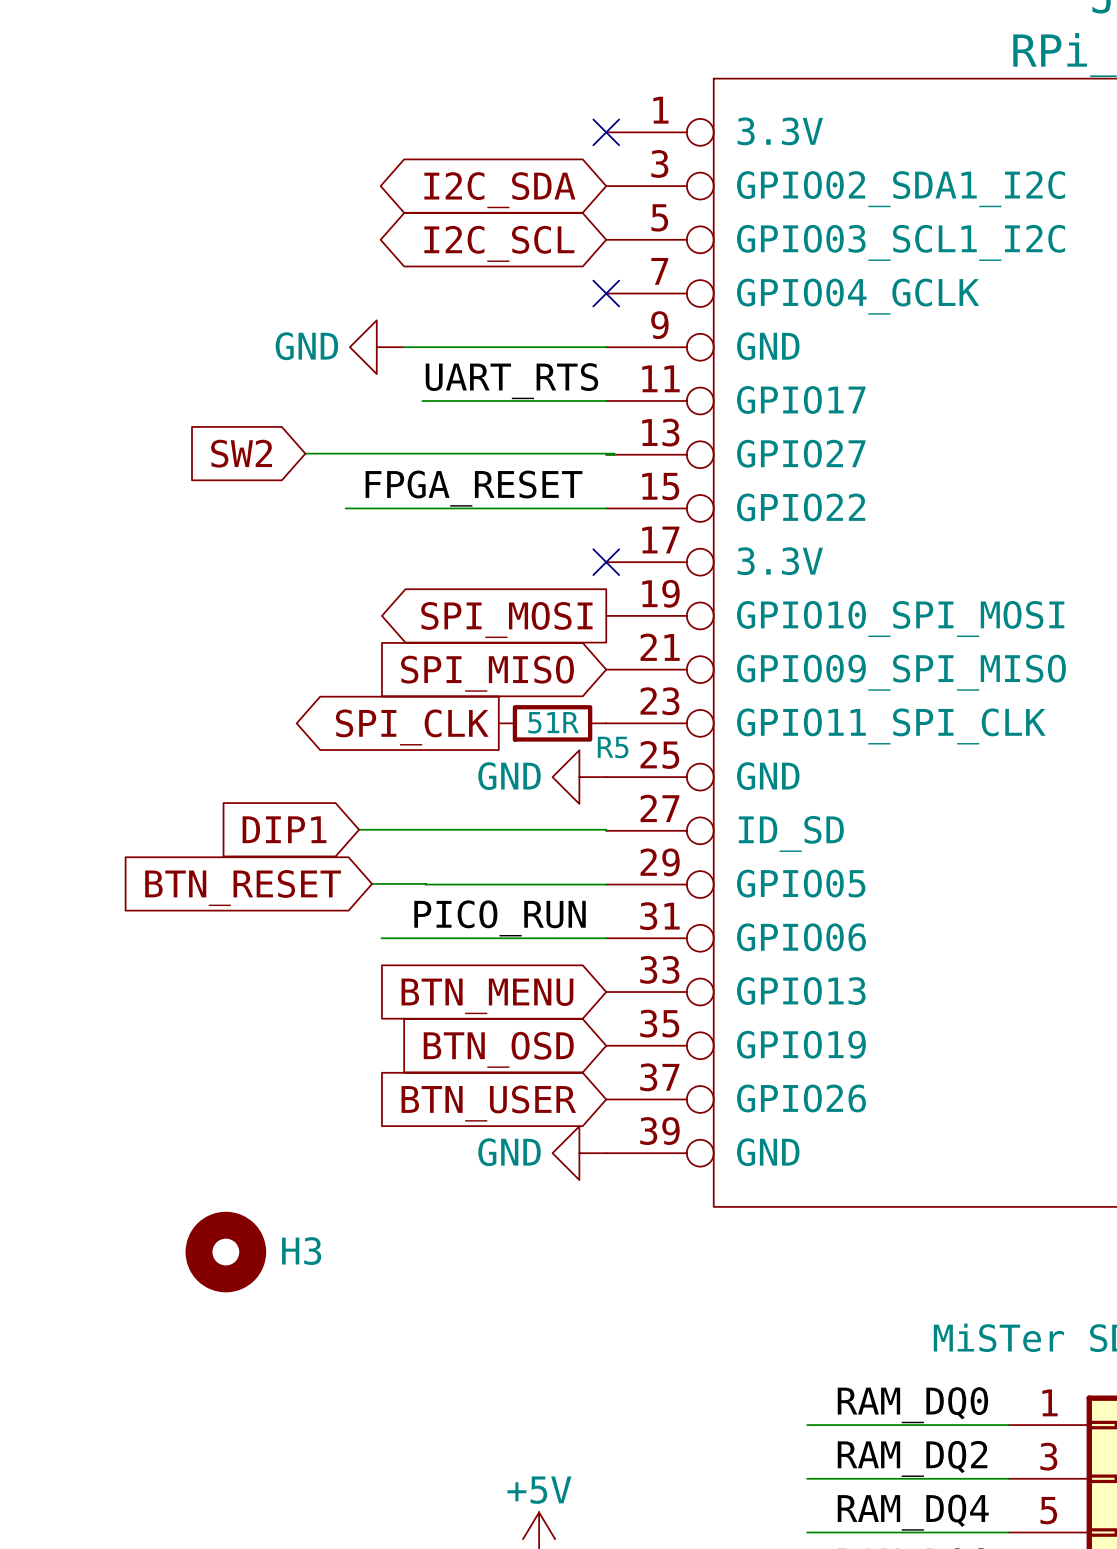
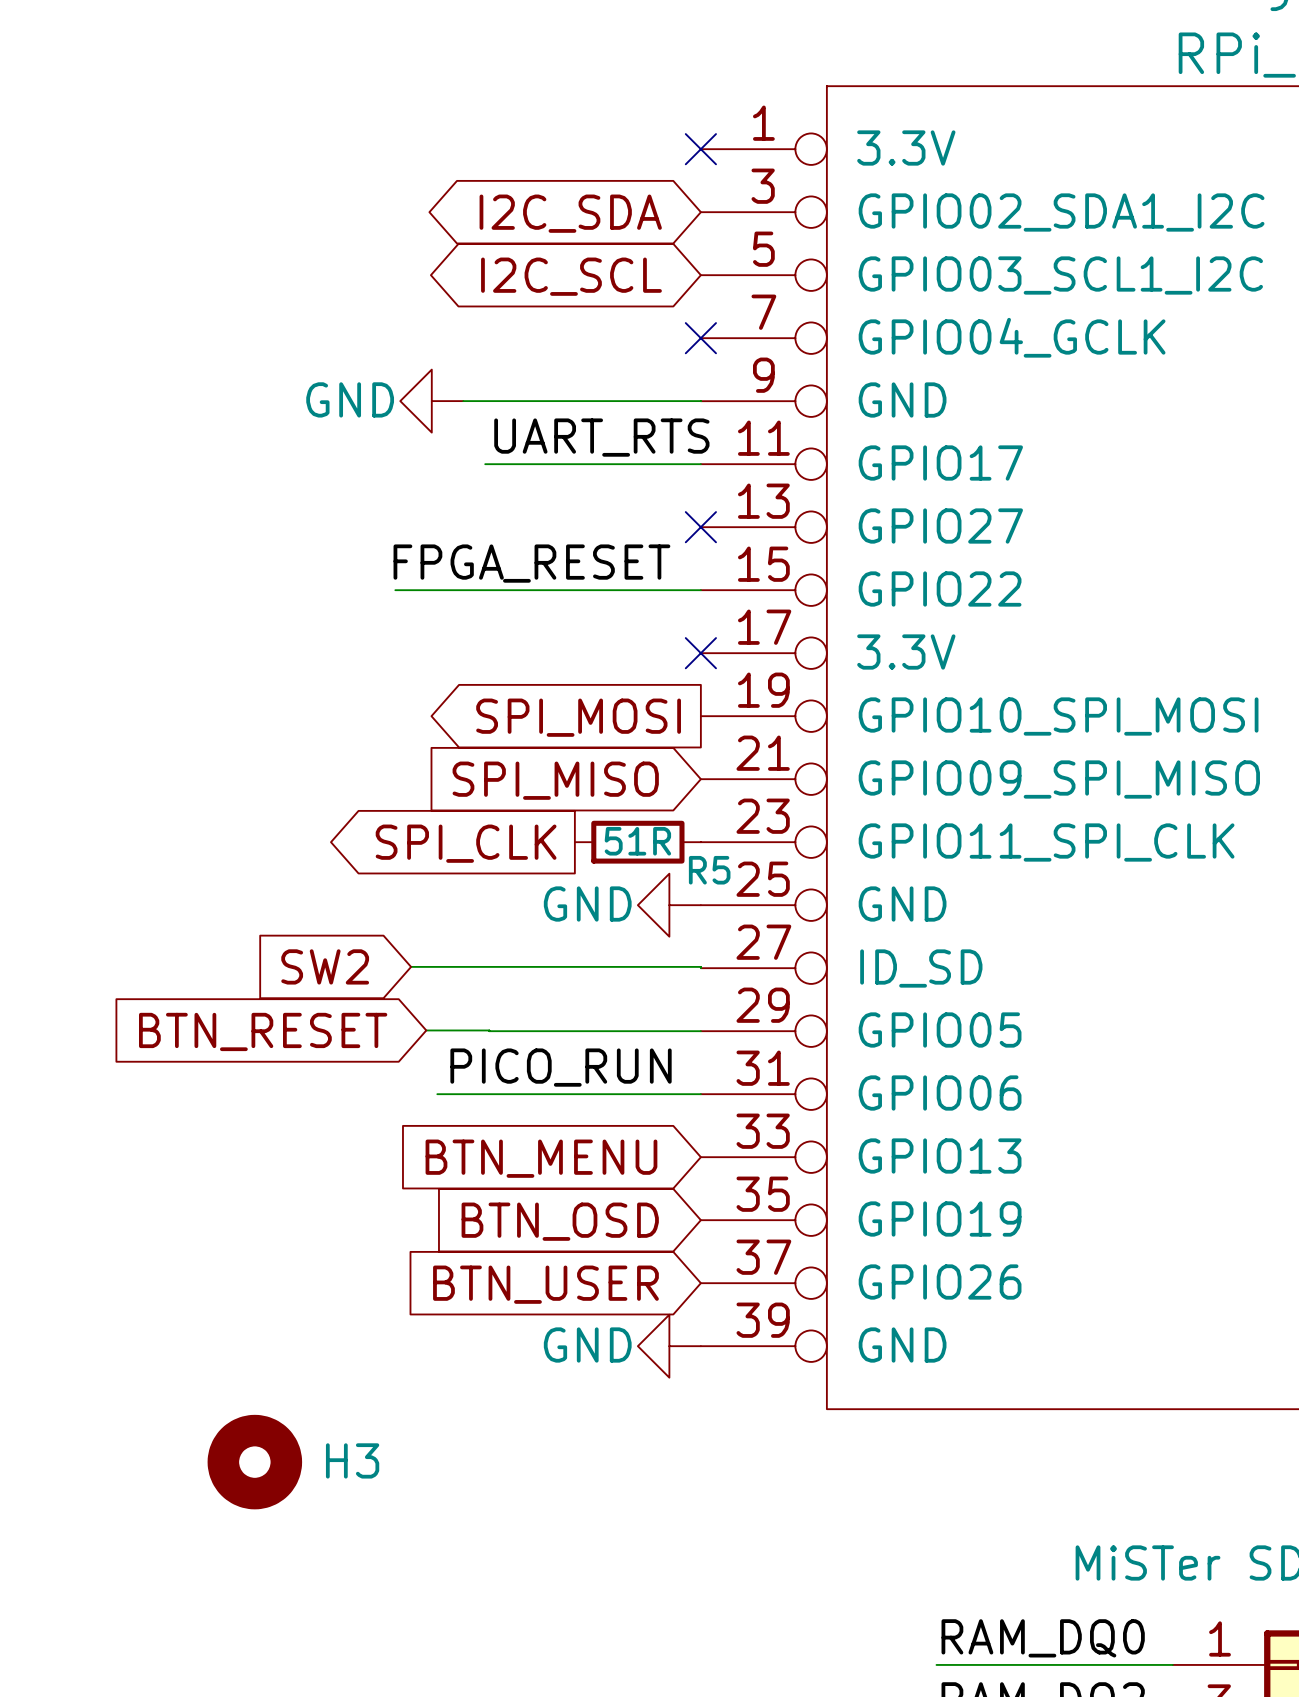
global label: SW2 (241, 453) -> none
wire: (305, 453) (614, 453) (606, 454) -> none
no-connect mark: none -> (700, 527)
global label: DIP1 (284, 829) -> SW2 (325, 966)

